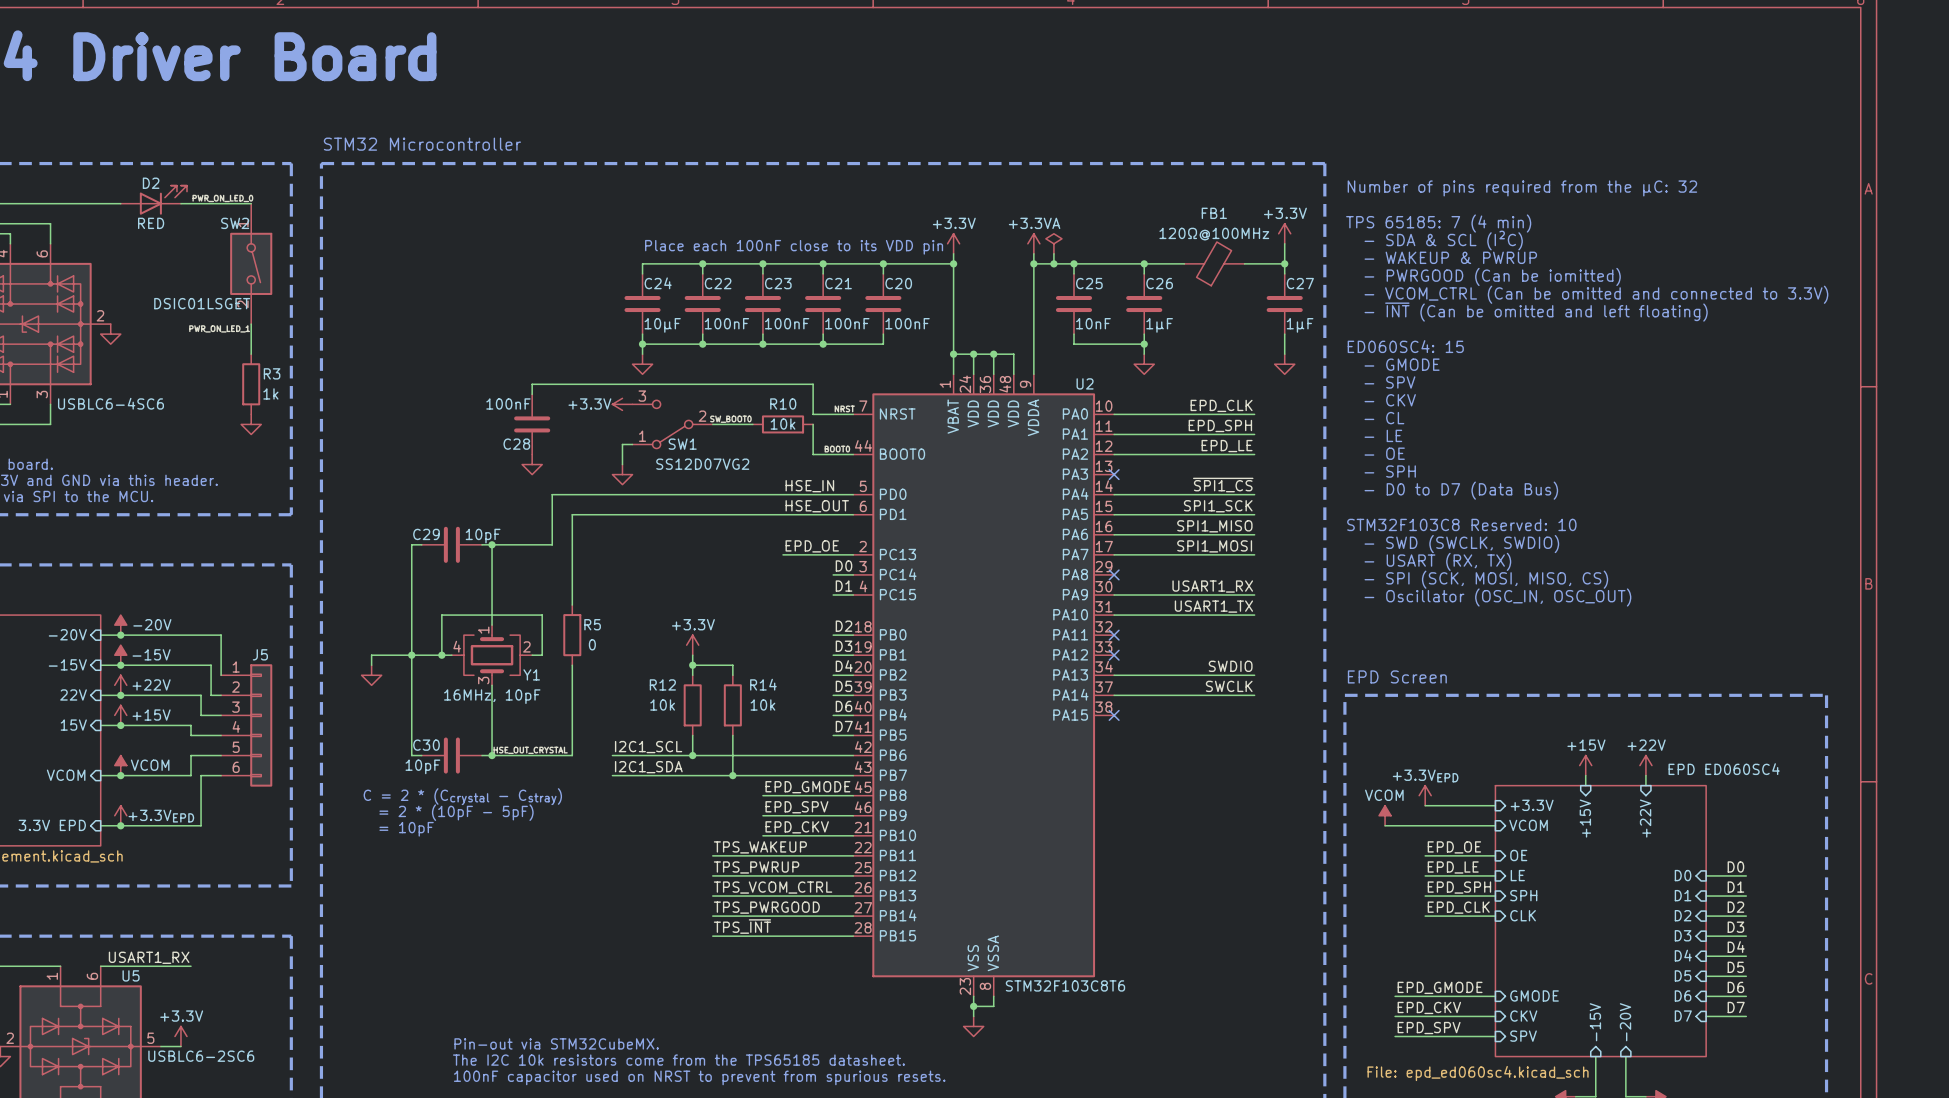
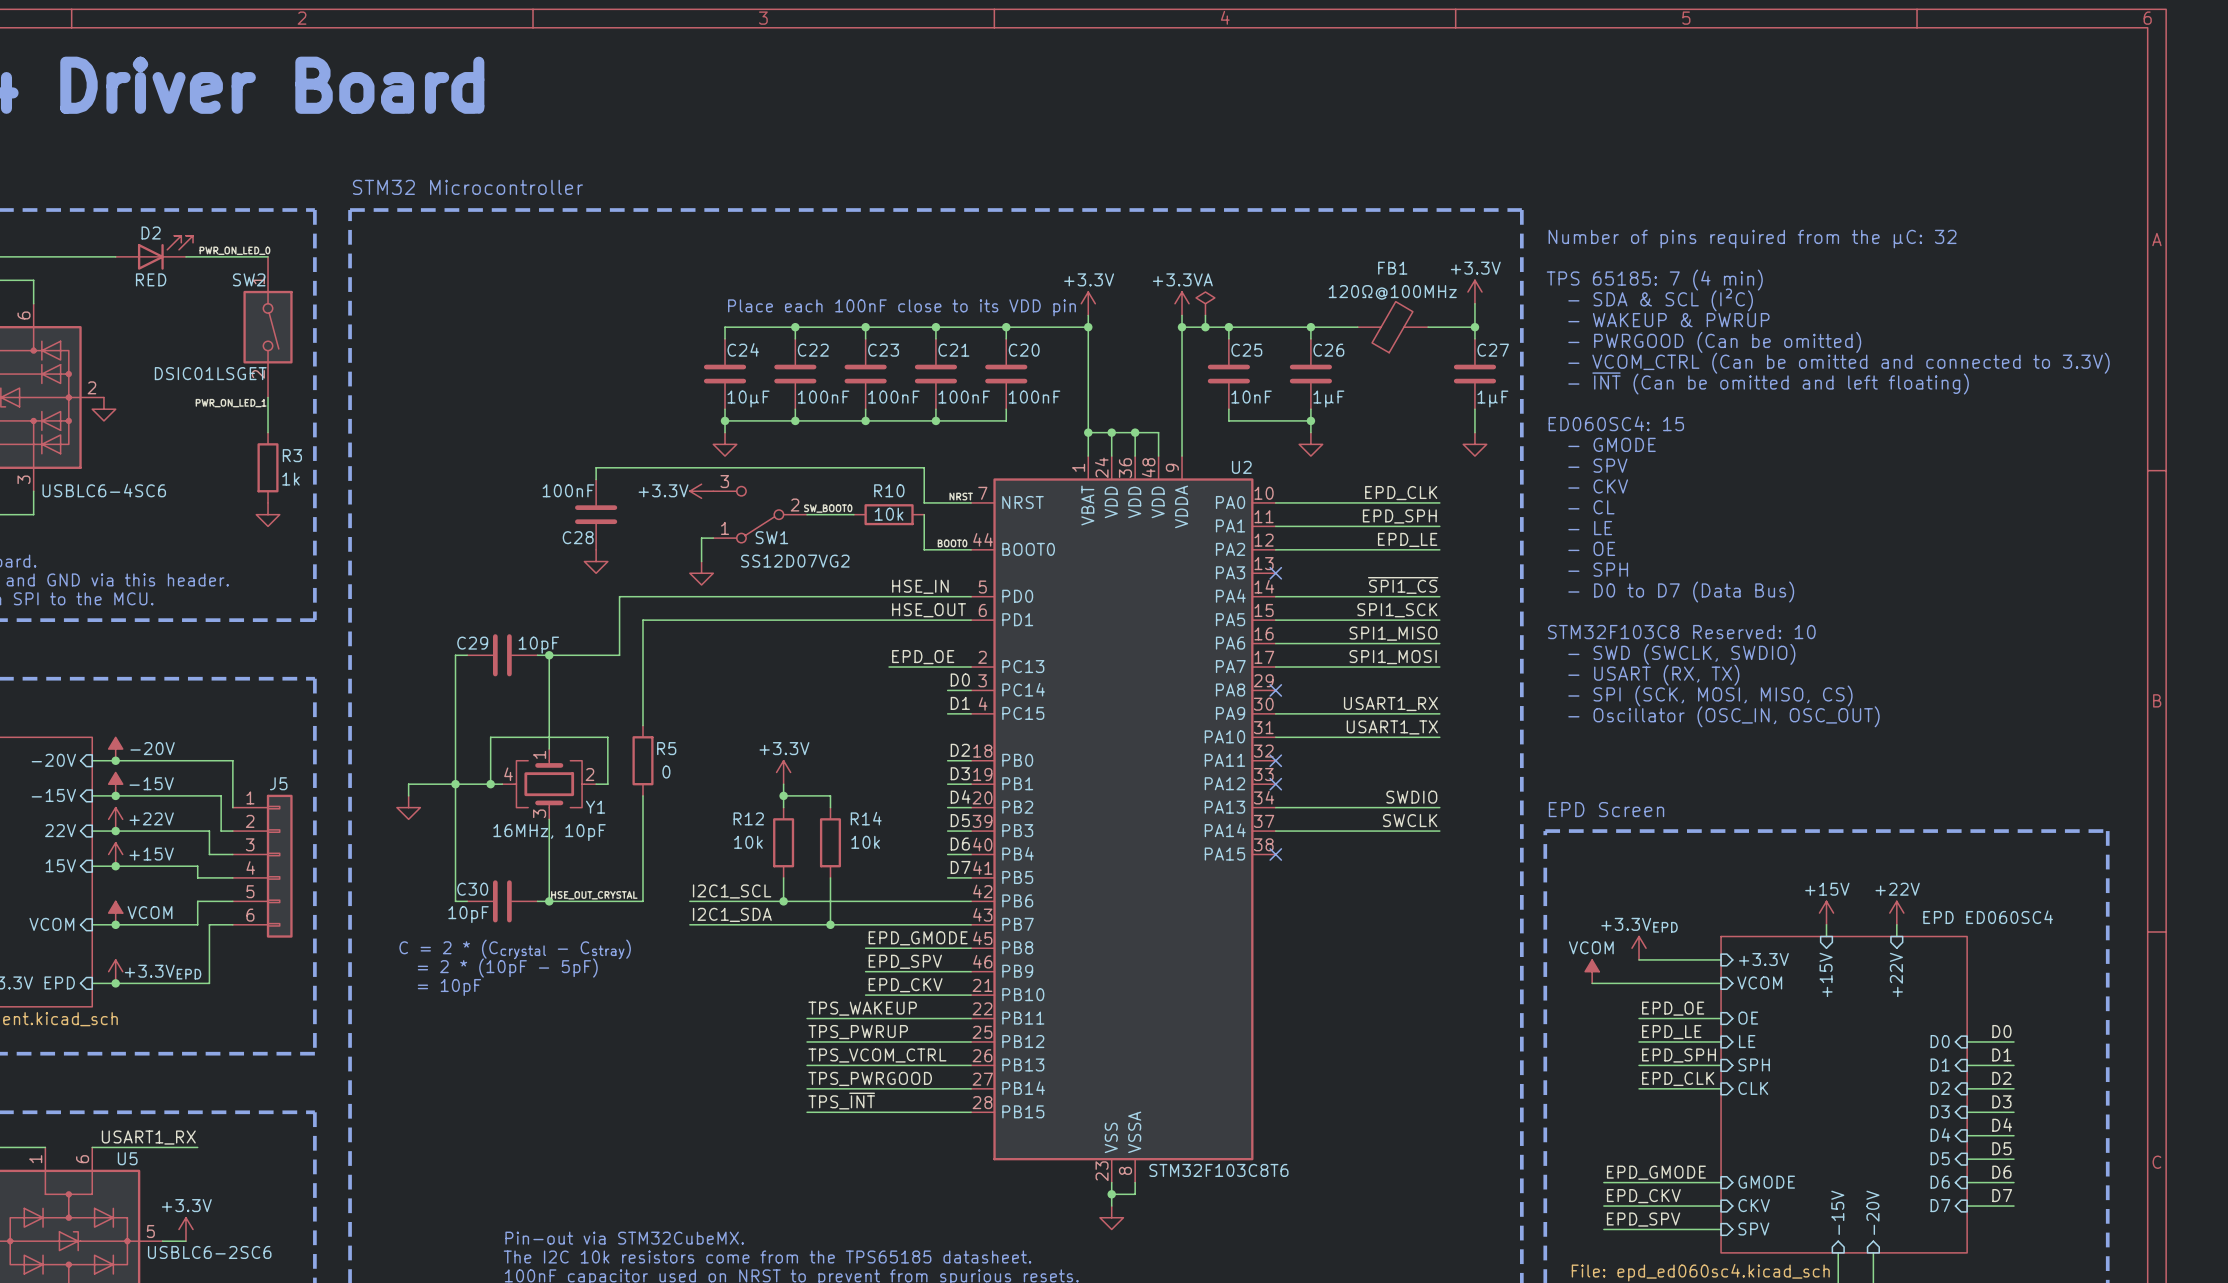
text: - PWRGOOD (Can be iomitted) (1492, 276) -> - PWRGOOD (Can be omitted) (1714, 342)

